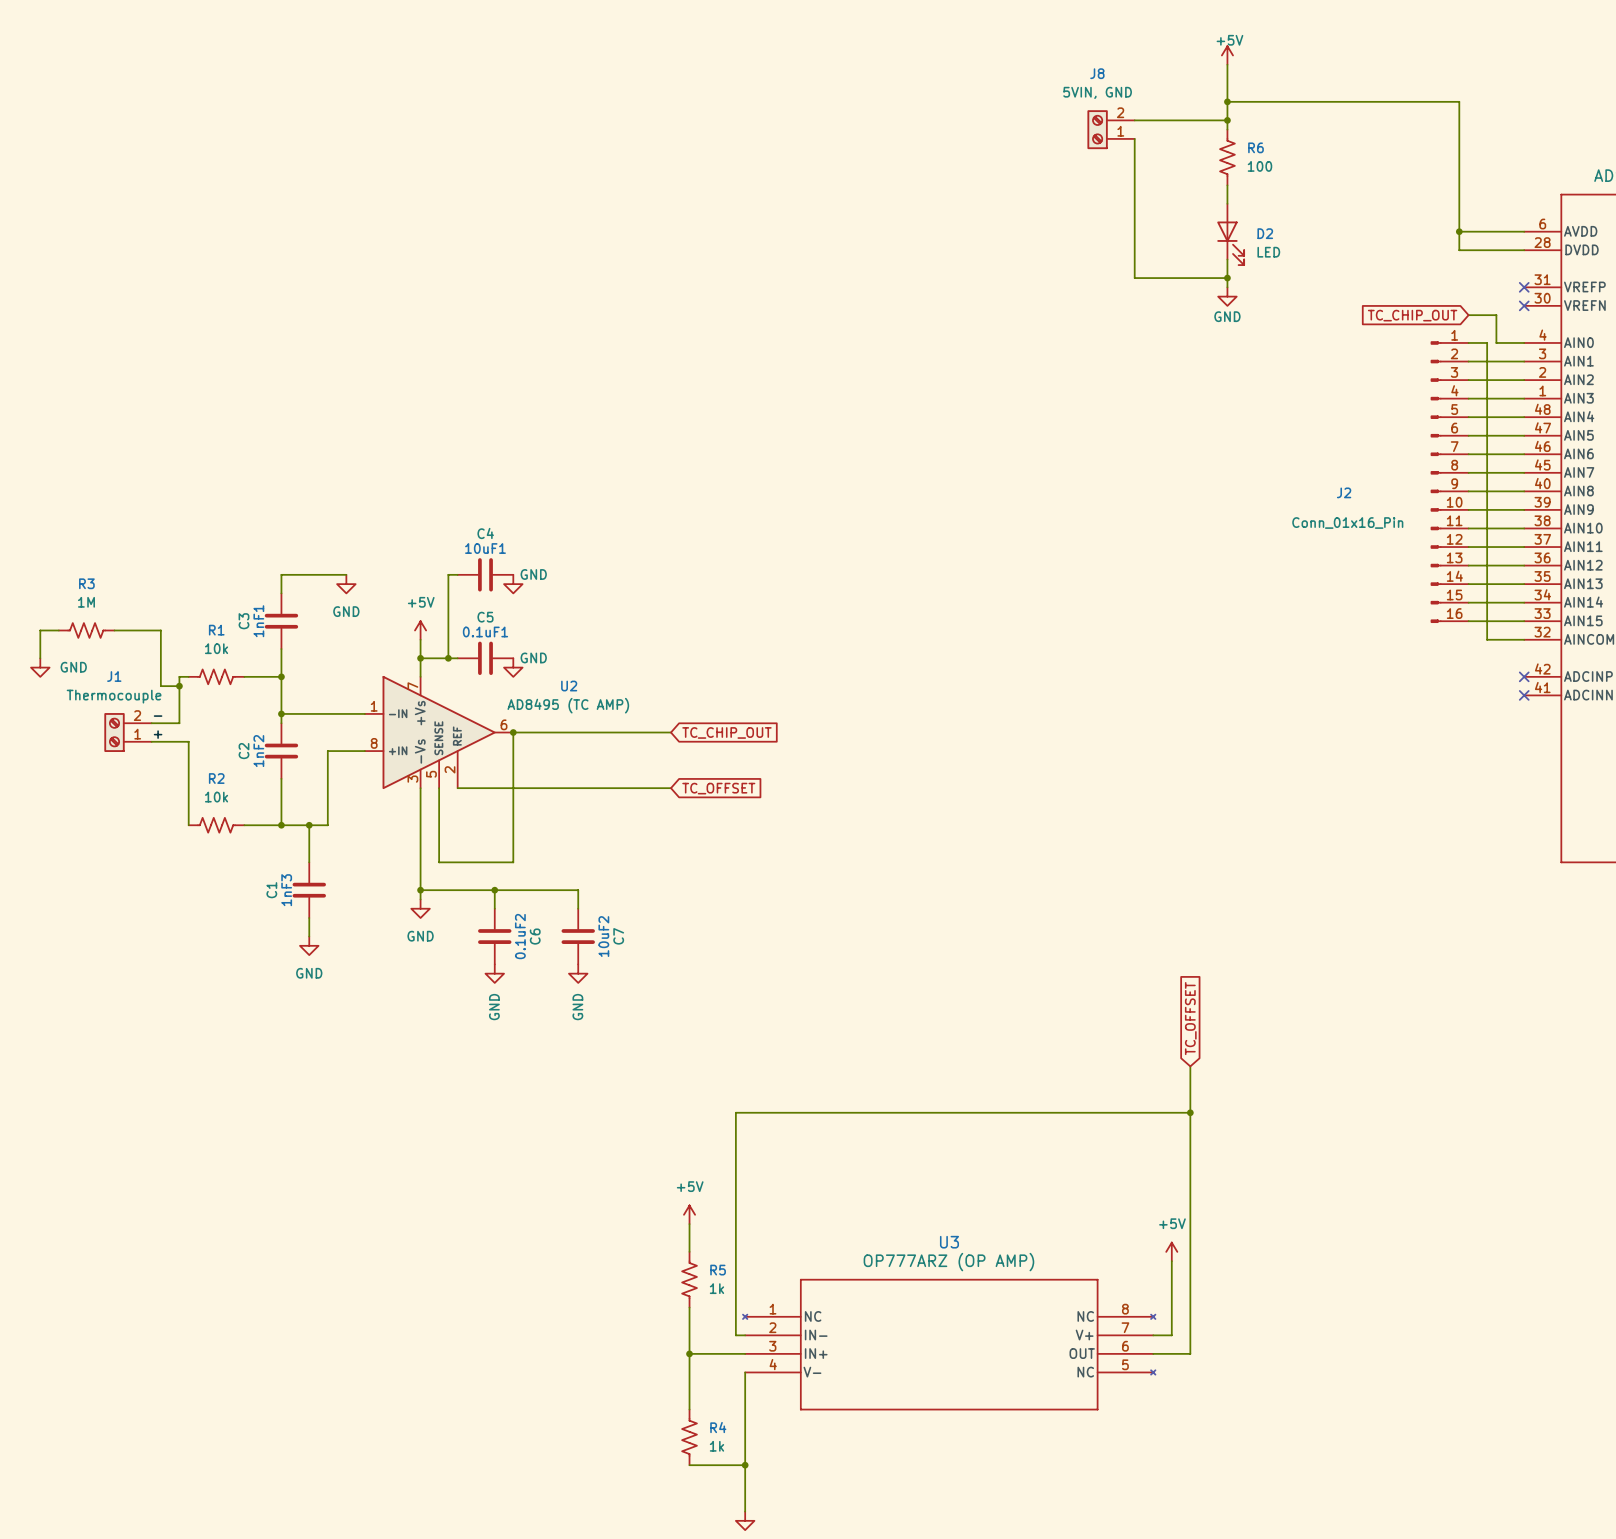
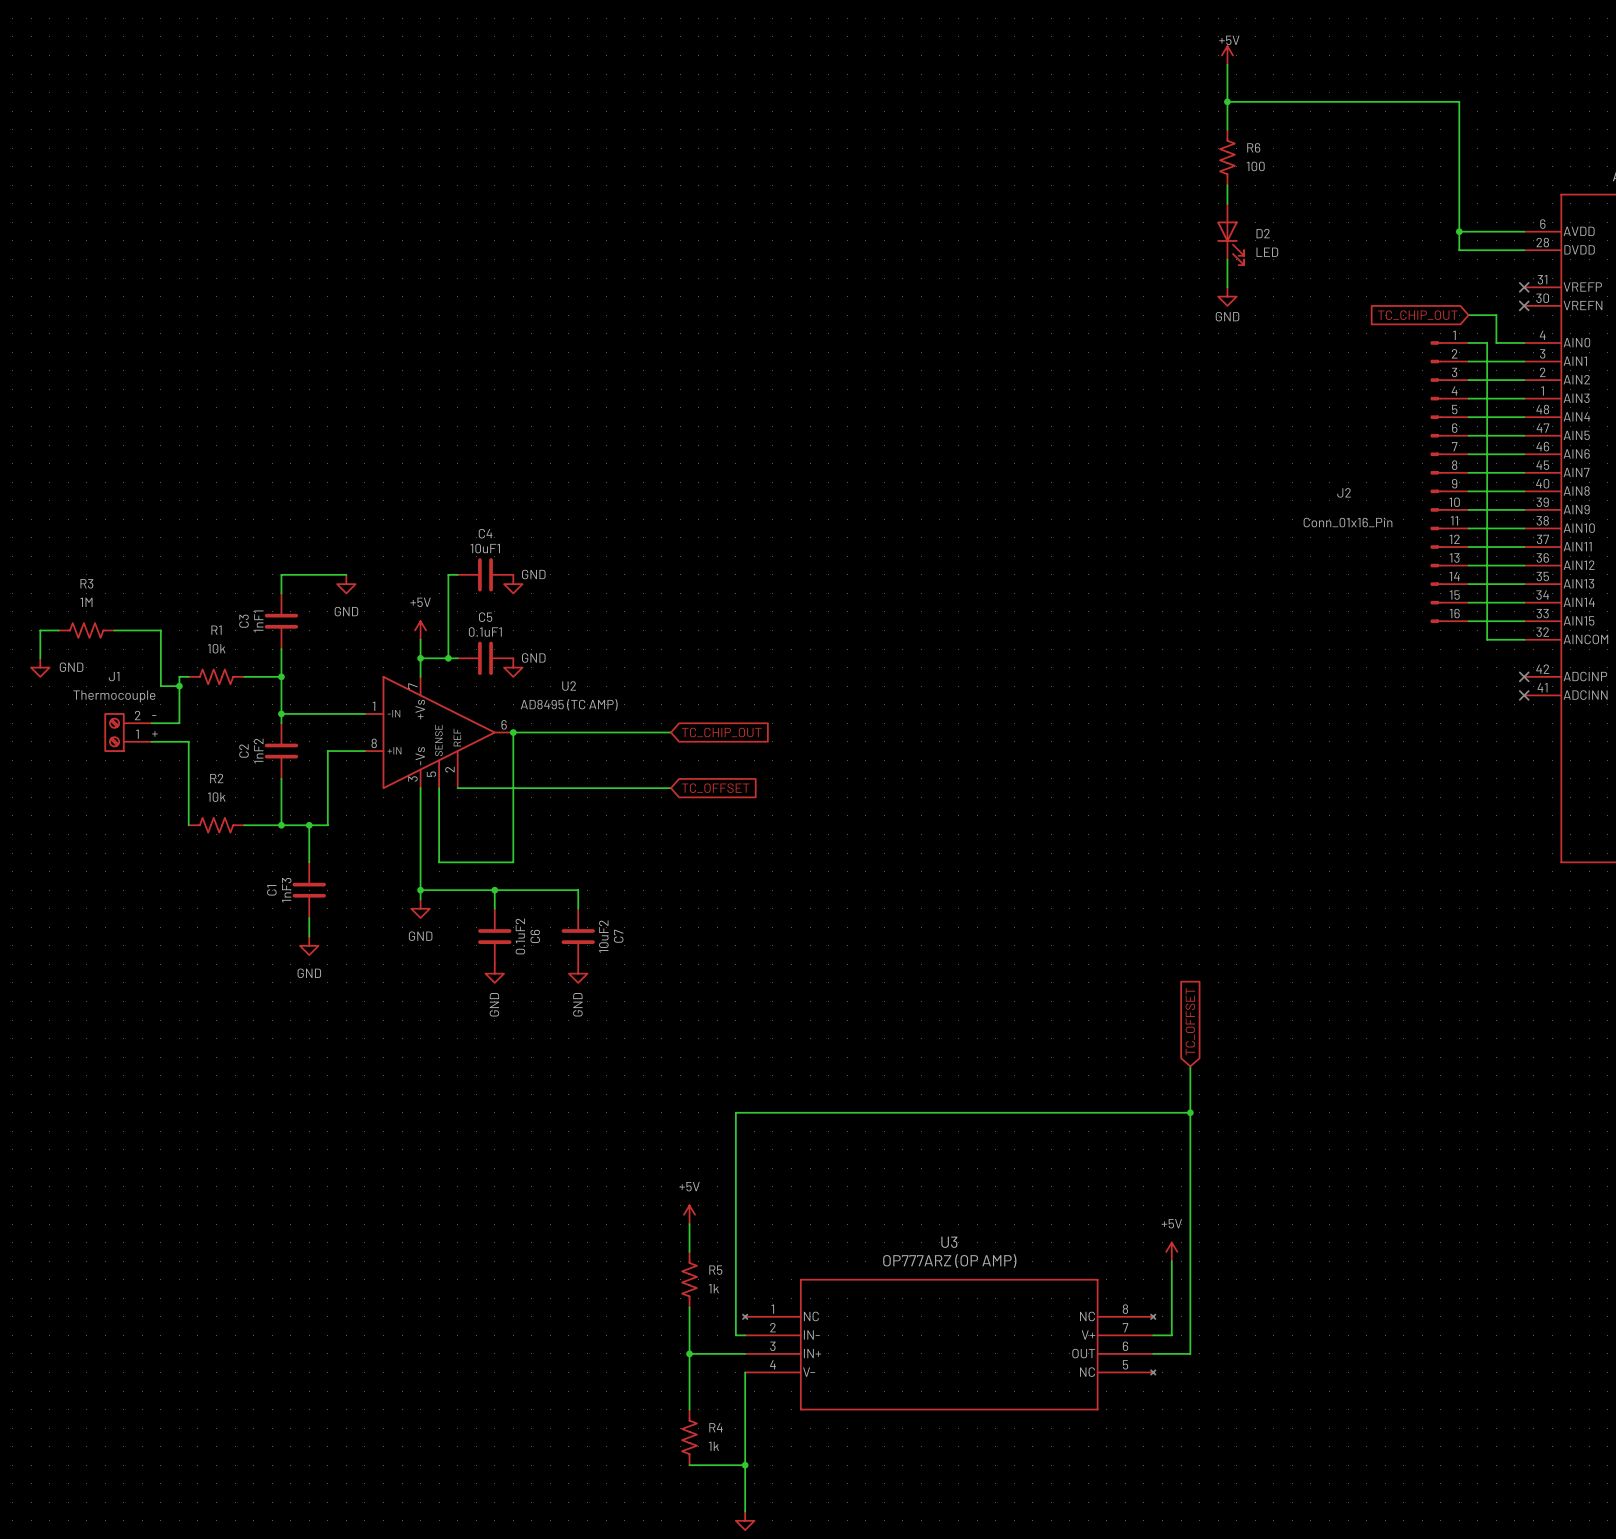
wire: (1134, 120) (1227, 120) -> none
junction: (1227, 120) -> none
J8: 5VIN, GND (1111, 129) -> none
wire: (1134, 138) (1134, 278) (1227, 278) -> none
junction: (1227, 278) -> none

